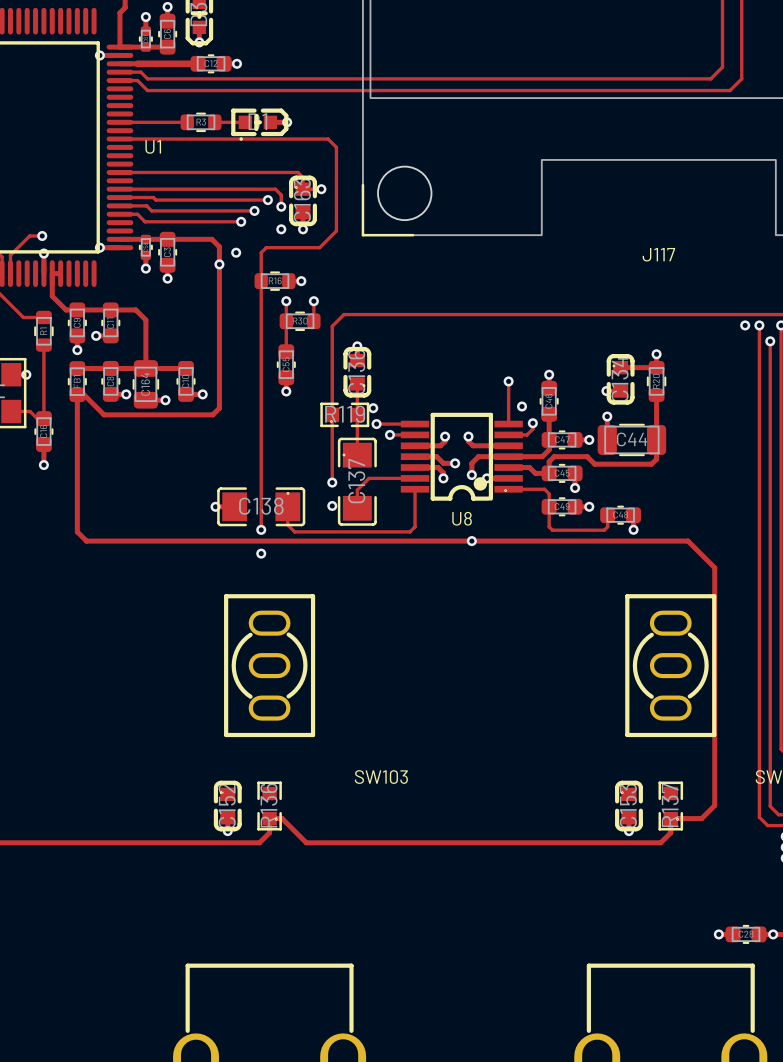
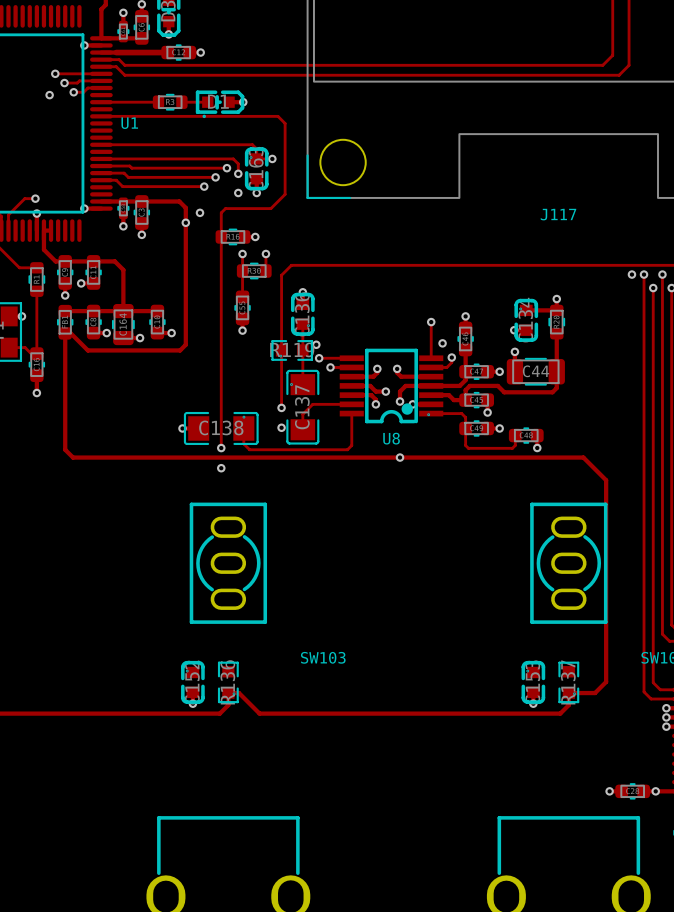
track: none -> (55, 73) (101, 73)
via: none -> (55, 73)
track: none -> (101, 80) (64, 83)
via: none -> (64, 83)
track: none -> (101, 88) (87, 88) (83, 92) (73, 92)
via: none -> (73, 92)
via: none -> (49, 95)

